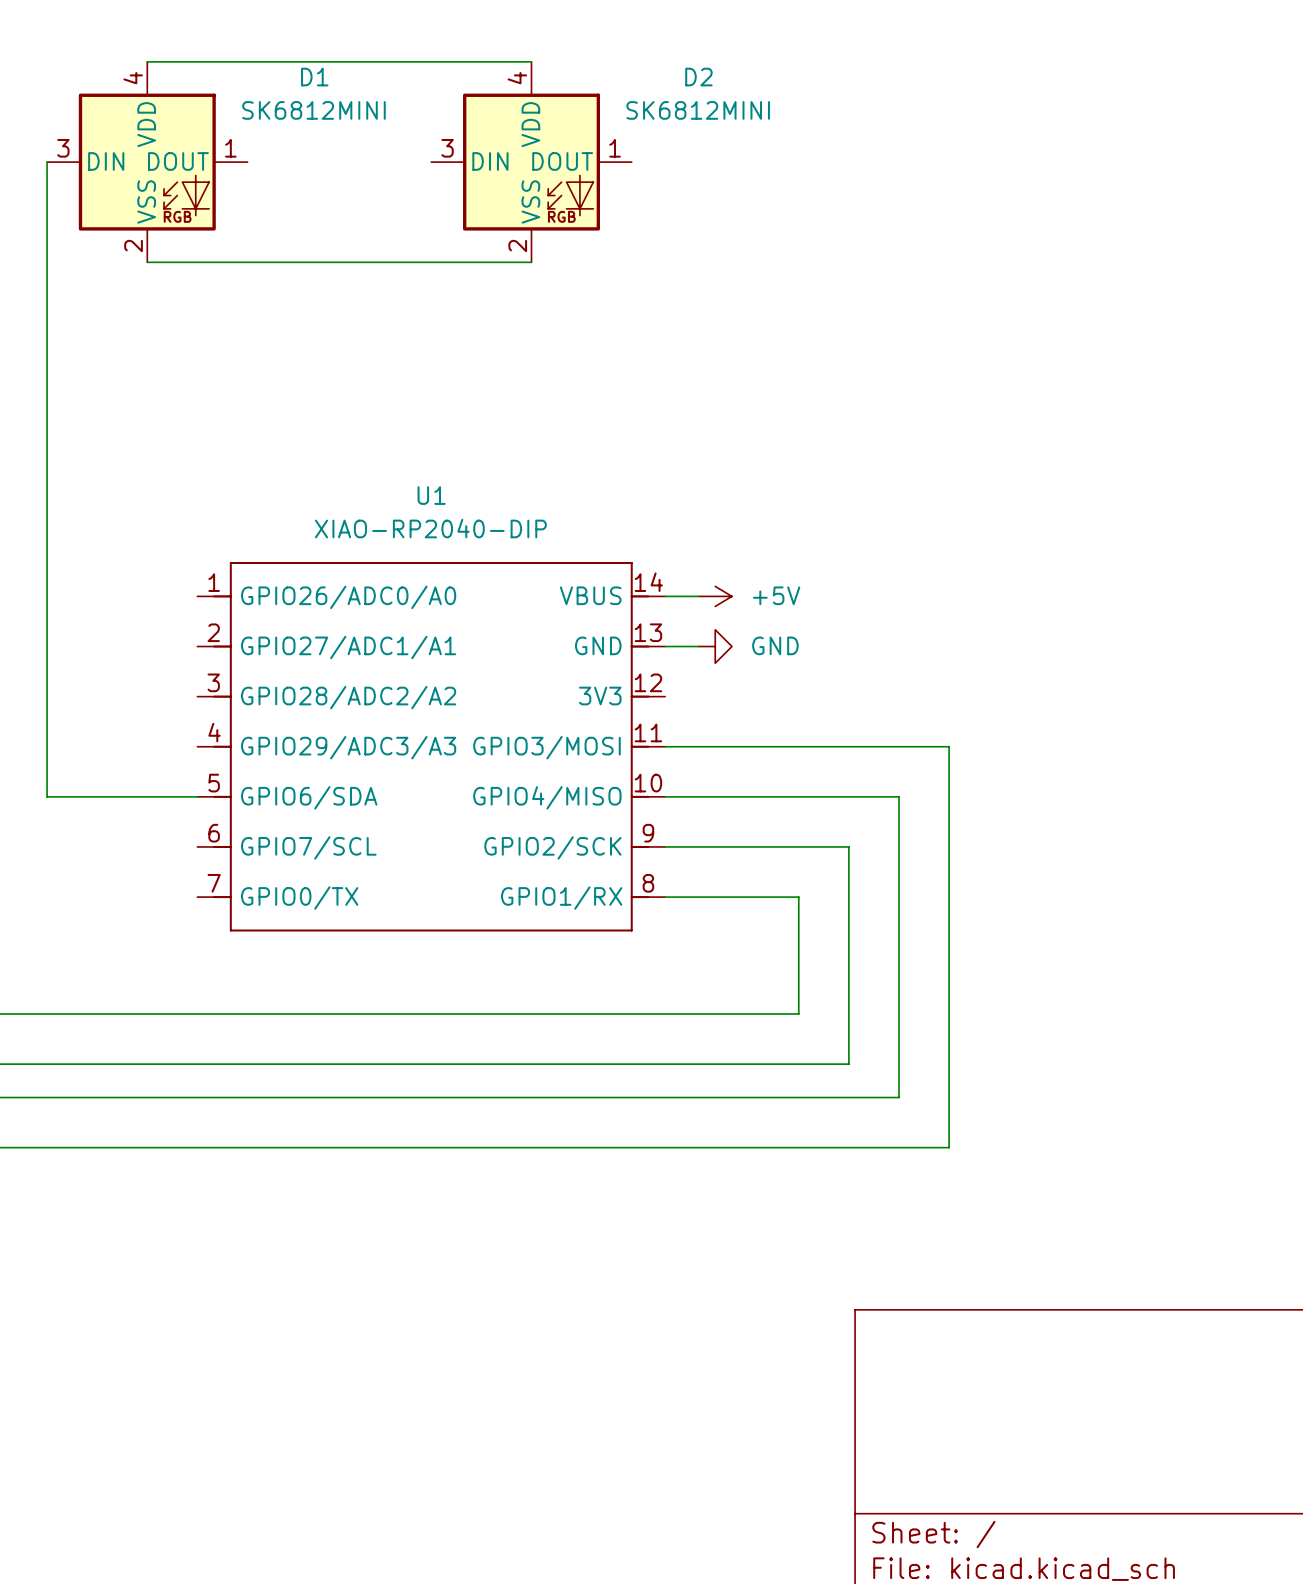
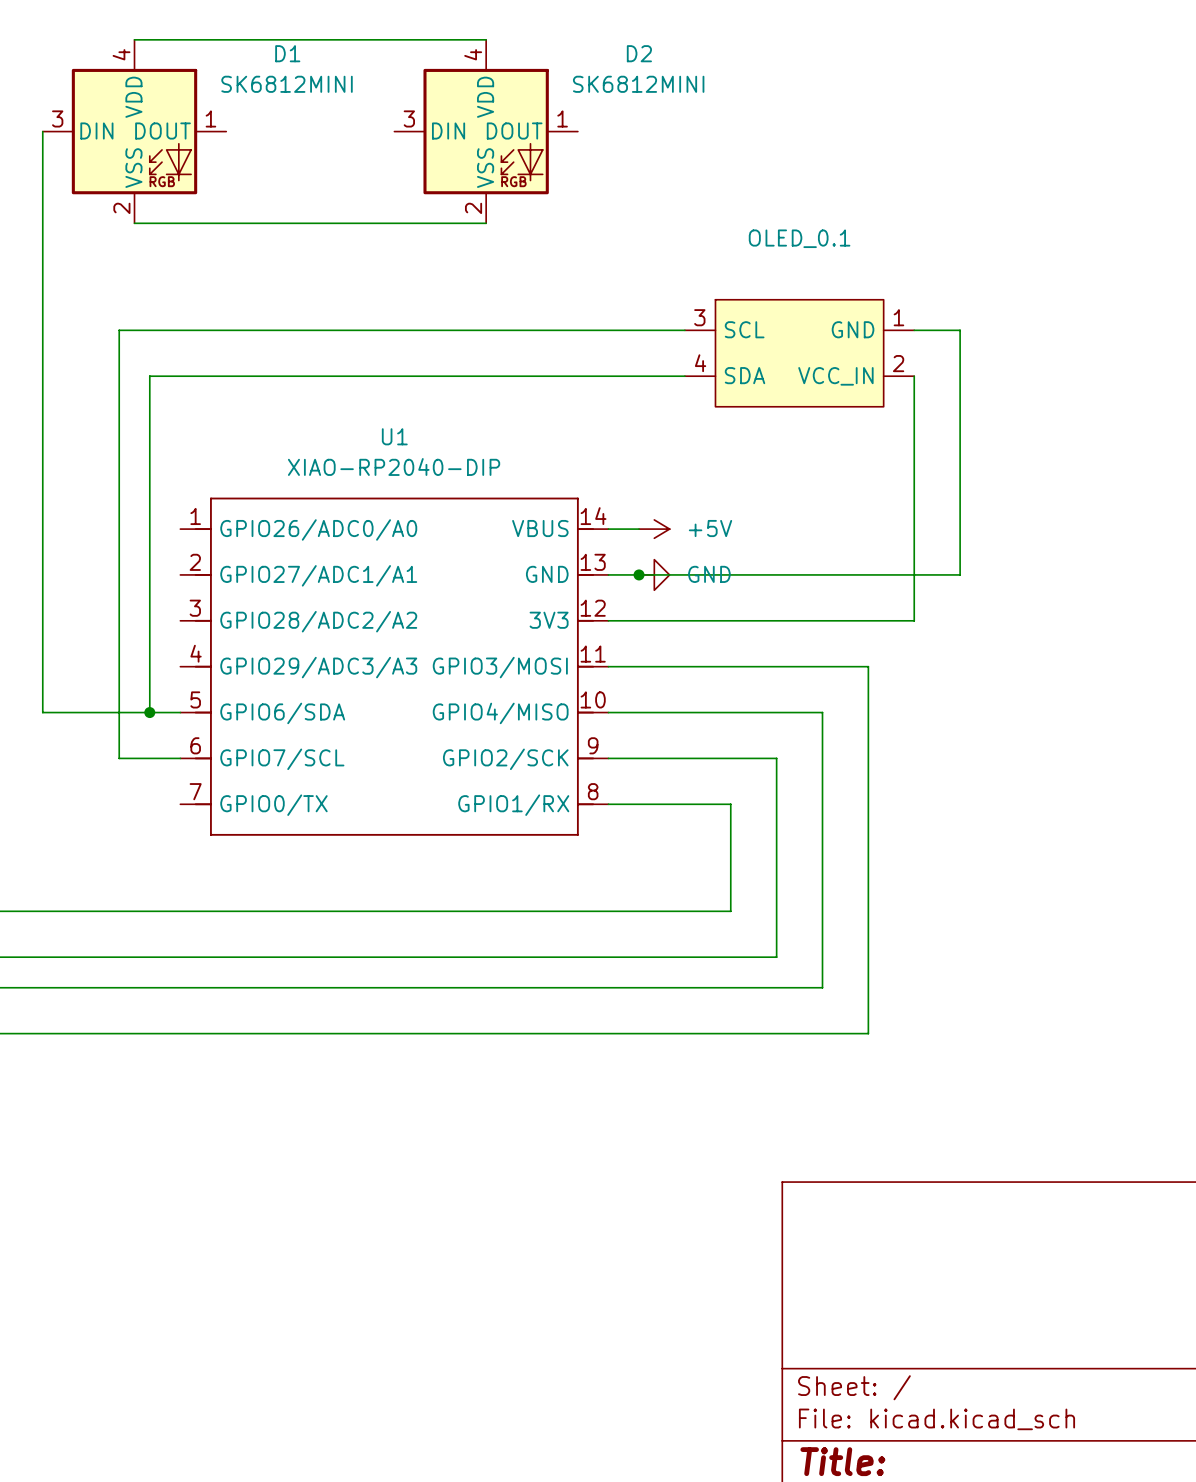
wire: none -> (684, 330) (119, 330) (119, 758) (180, 758)
wire: none -> (914, 330) (960, 330) (960, 574) (639, 574)
OLED_0.1: none -> (799, 353)
wire: none -> (684, 376) (149, 376) (149, 712)
wire: none -> (914, 376) (914, 620) (608, 620)
junction: none -> (639, 574)
junction: none -> (149, 712)

